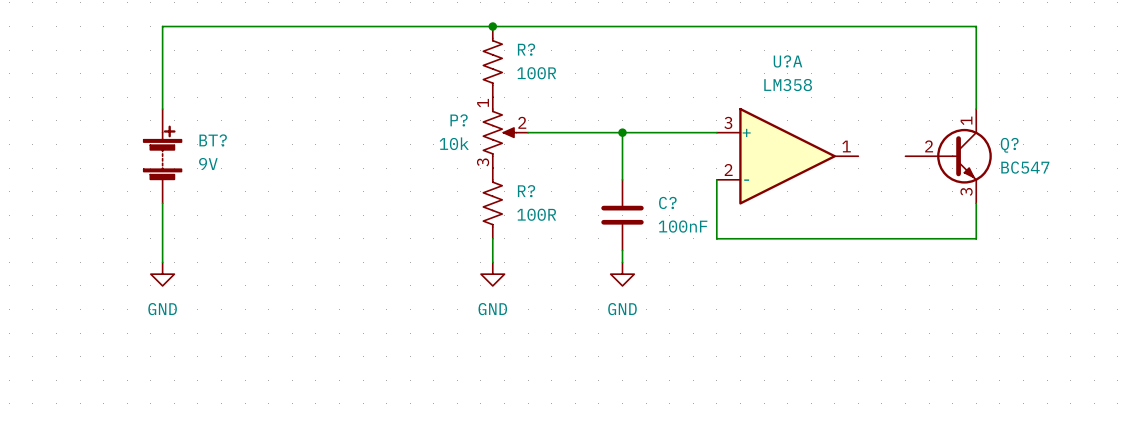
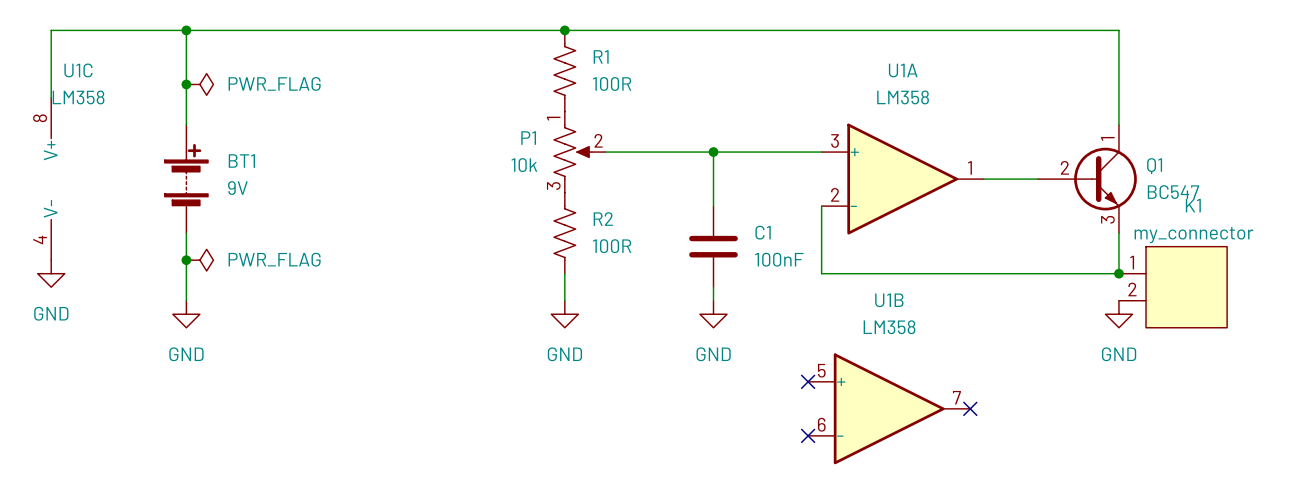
wire: none -> (186, 30) (51, 30) (51, 97)
junction: none -> (186, 30)
R? name: R? (526, 49) -> R1 (601, 56)
U?A name: U?A (788, 61) -> U1A (903, 70)
junction: none -> (186, 84)
power symbol: none -> PWR_FLAG (199, 84)
P? name: P? (459, 120) -> P1 (528, 138)
BT? name: BT? (213, 140) -> BT1 (241, 161)
Q? name: Q? (1009, 145) -> Q1 (1154, 166)
U1C: none -> LM358 (51, 179)
wire: none -> (983, 179) (1037, 179)
R? name: R? (526, 191) -> R2 (603, 219)
C? name: C? (667, 202) -> C1 (763, 232)
junction: none -> (186, 260)
power symbol: none -> PWR_FLAG (199, 260)
power symbol: none -> GND (51, 273)
junction: none -> (1118, 273)
power symbol: none -> GND (1118, 314)
K1: none -> my_connector (801, 321)
no-connect mark: none -> (808, 381)
U1B: none -> LM358 (889, 408)
no-connect mark: none -> (970, 408)
no-connect mark: none -> (808, 435)

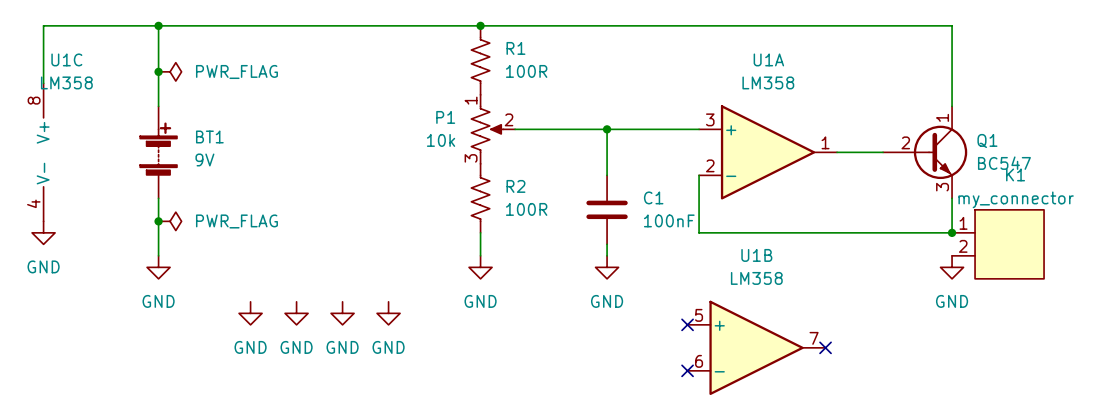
power symbol: none -> GND (250, 313)
power symbol: none -> GND (296, 313)
power symbol: none -> GND (342, 313)
power symbol: none -> GND (388, 313)

